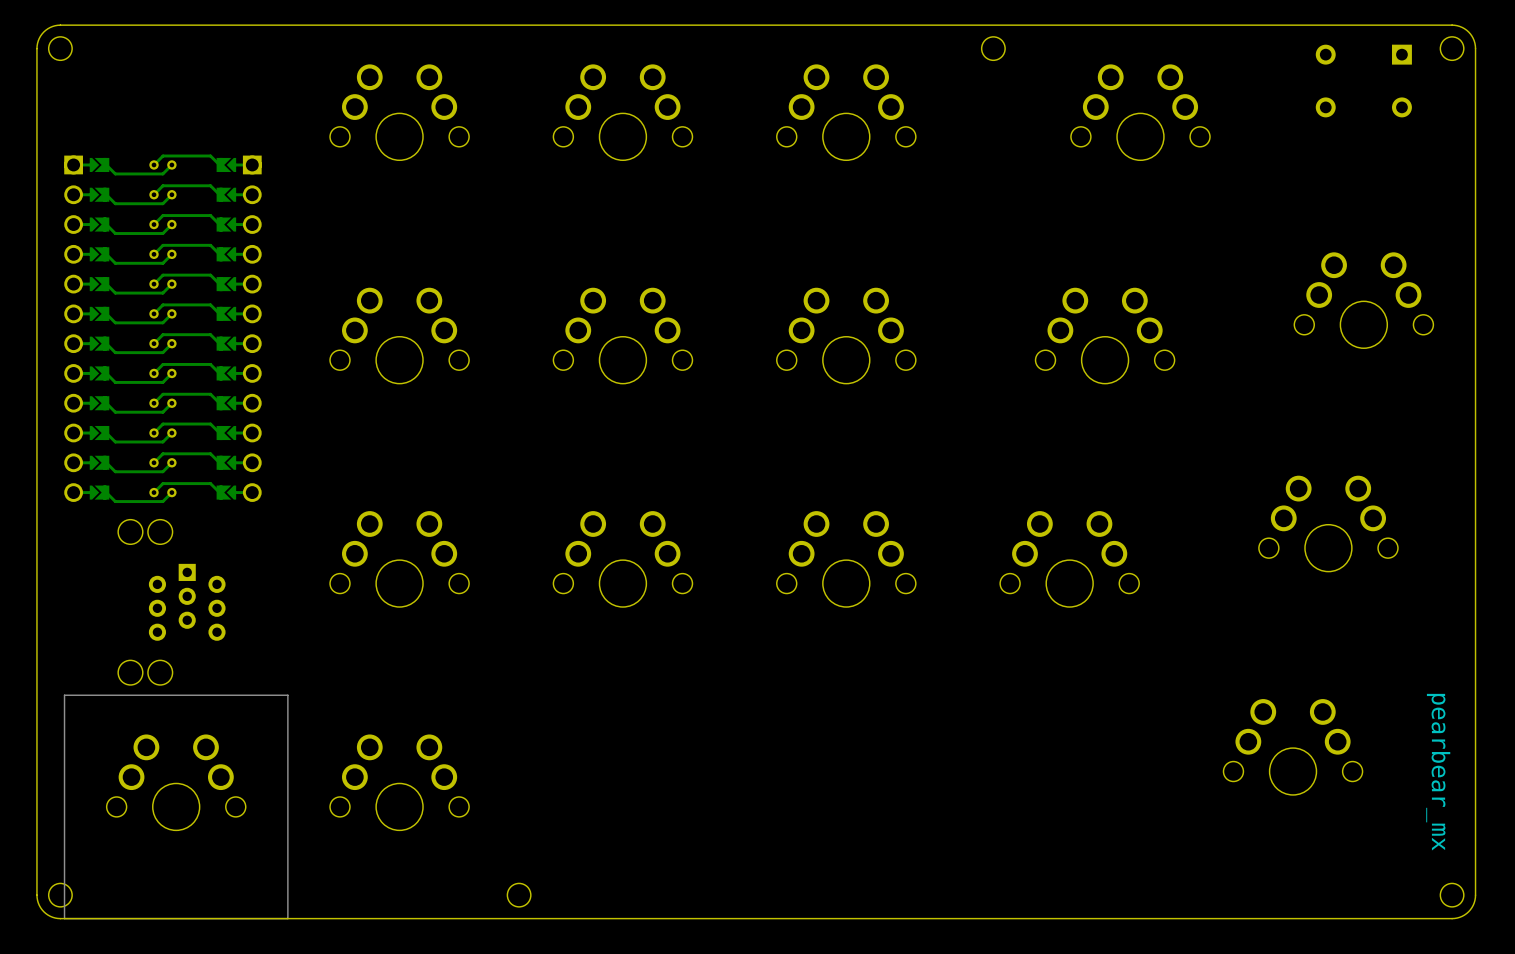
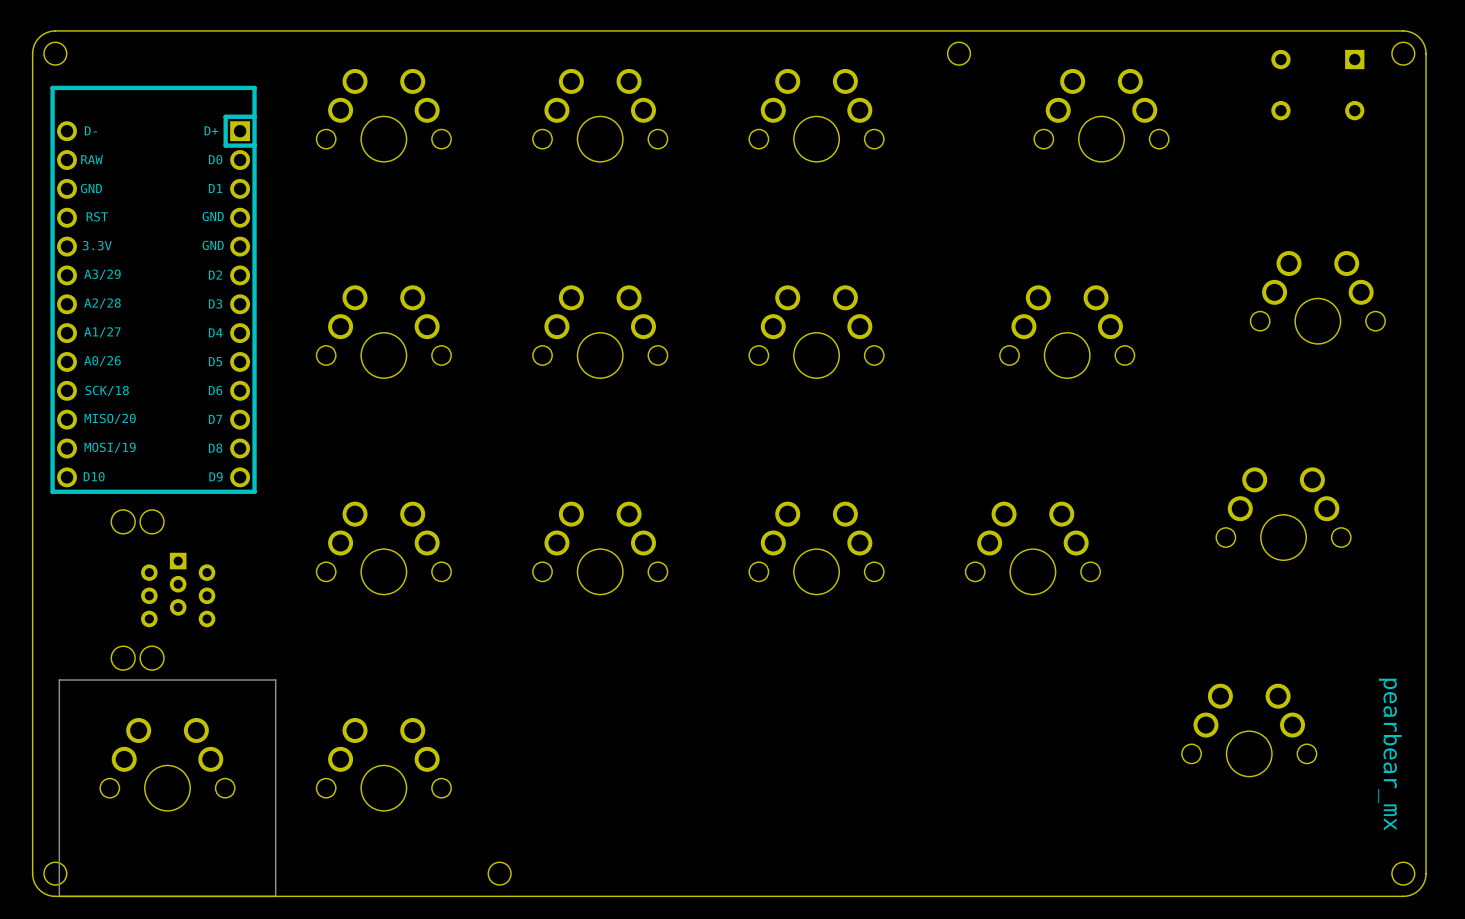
part: none -> (153, 289)
part: (162, 328) -> none

